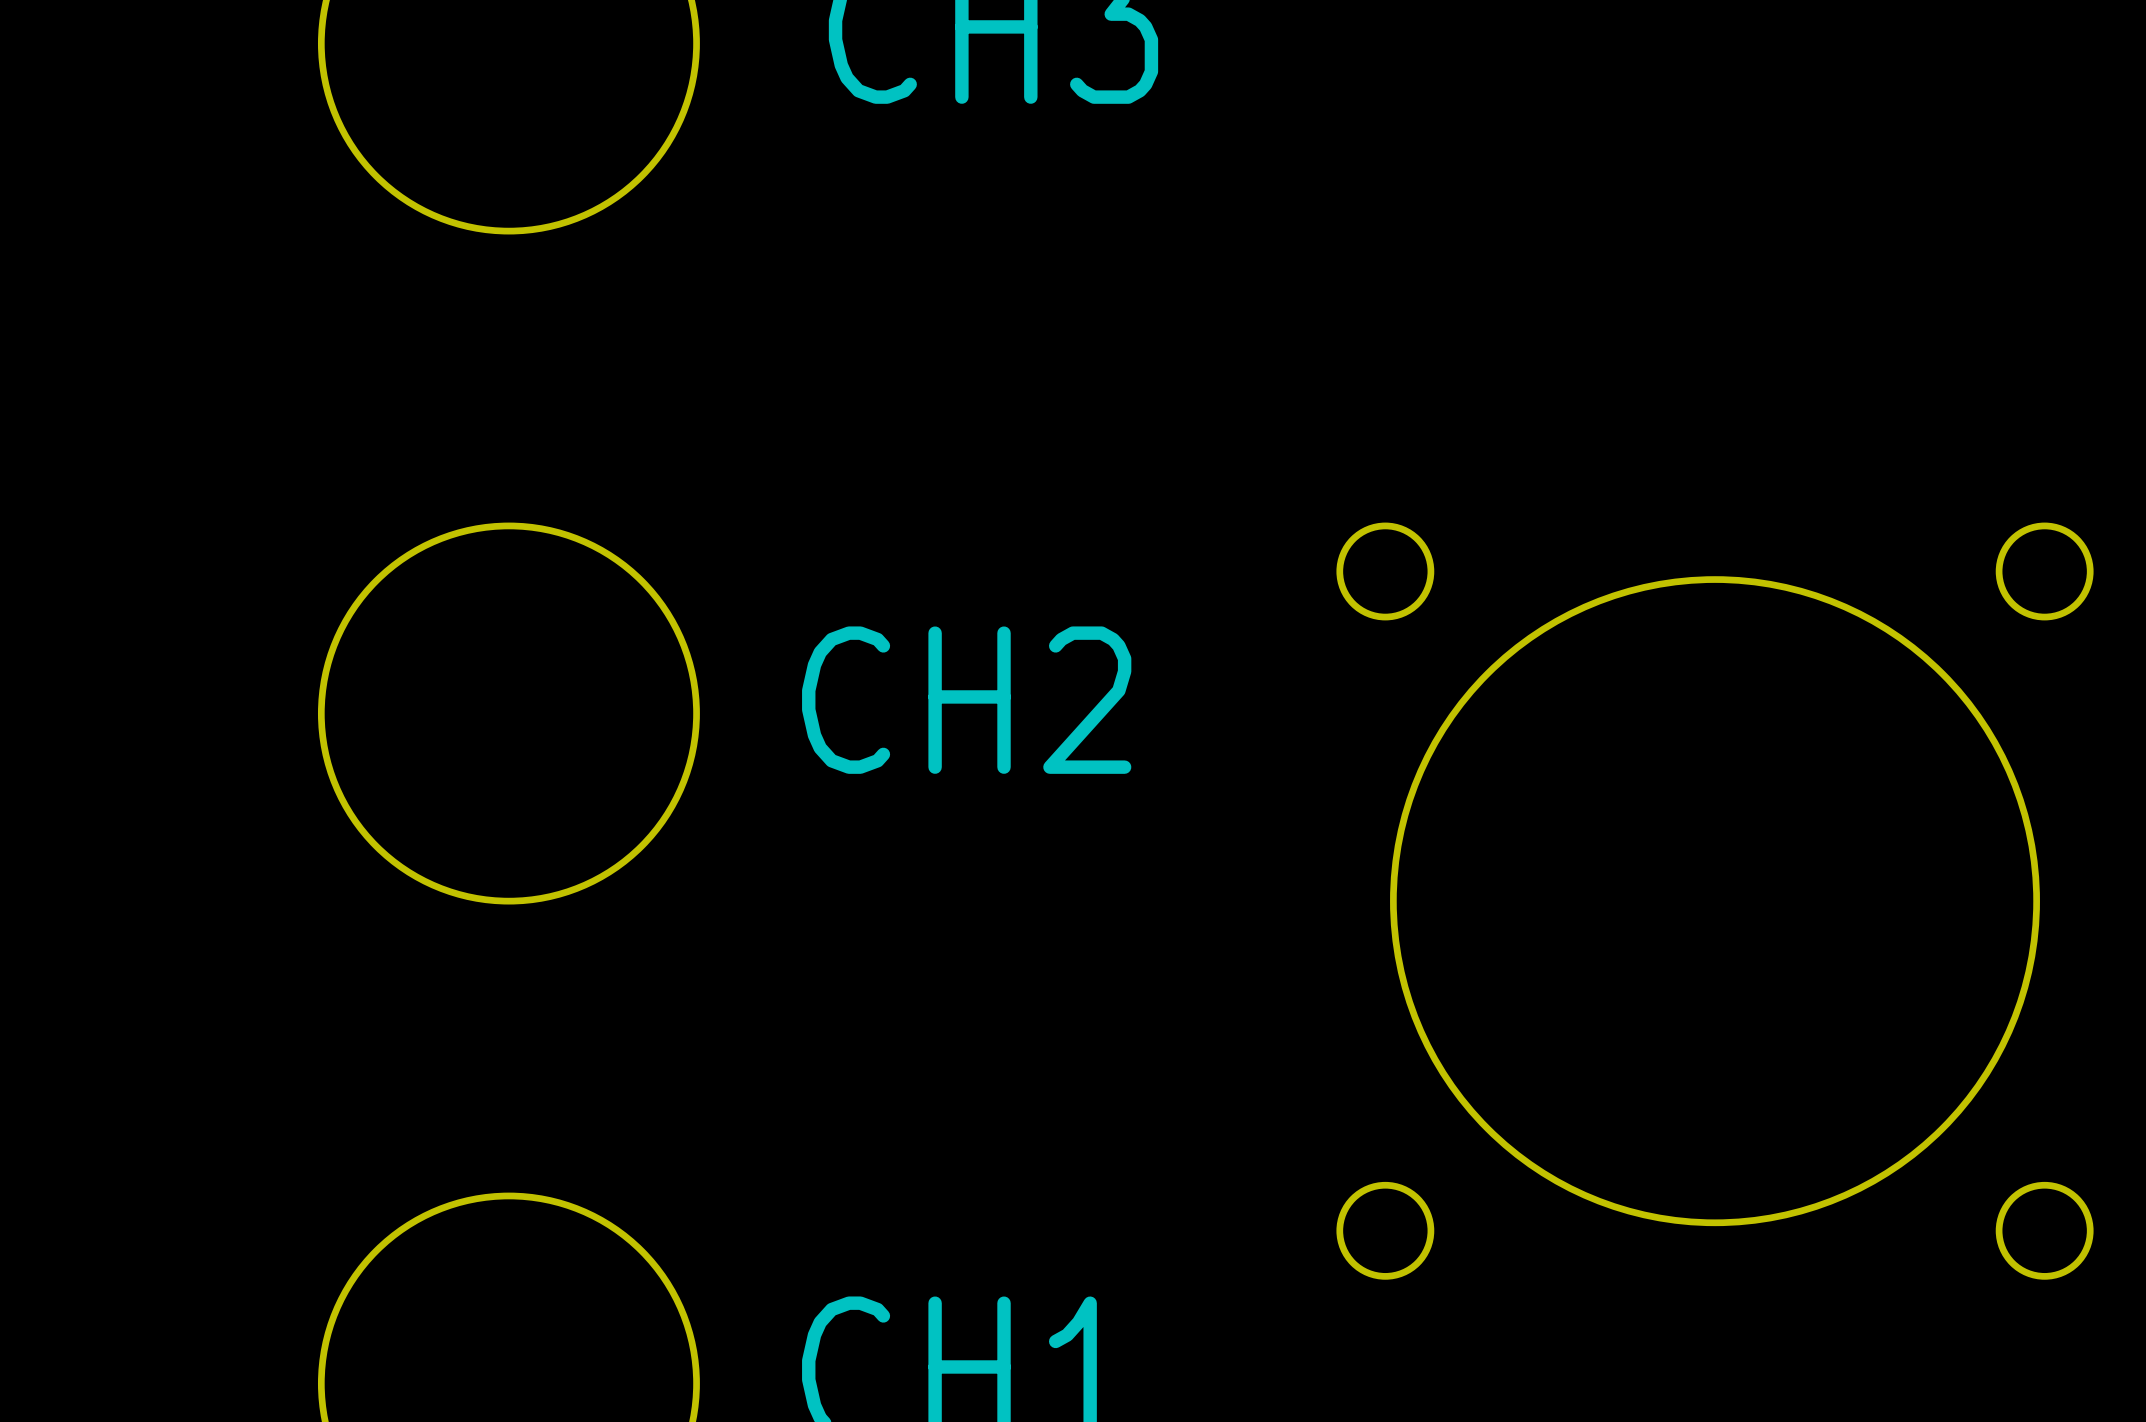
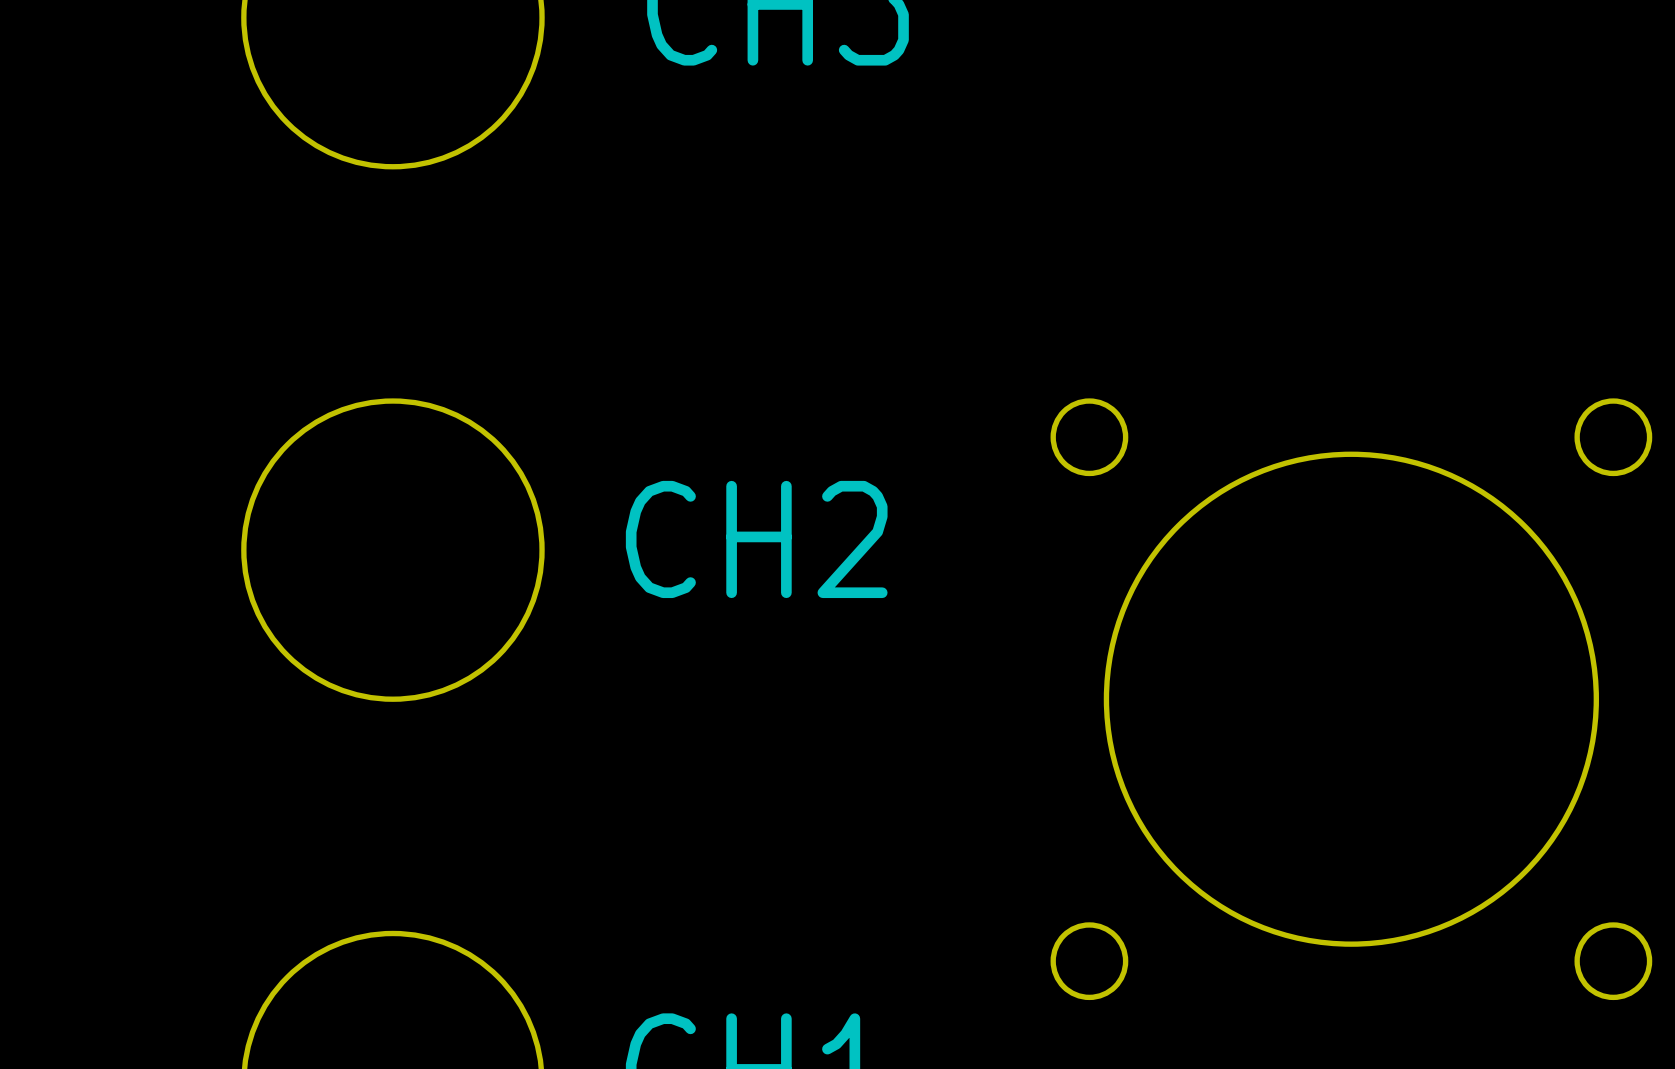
round board edge size: [1390, 576, 2040, 1227] -> [1103, 451, 1599, 947]

